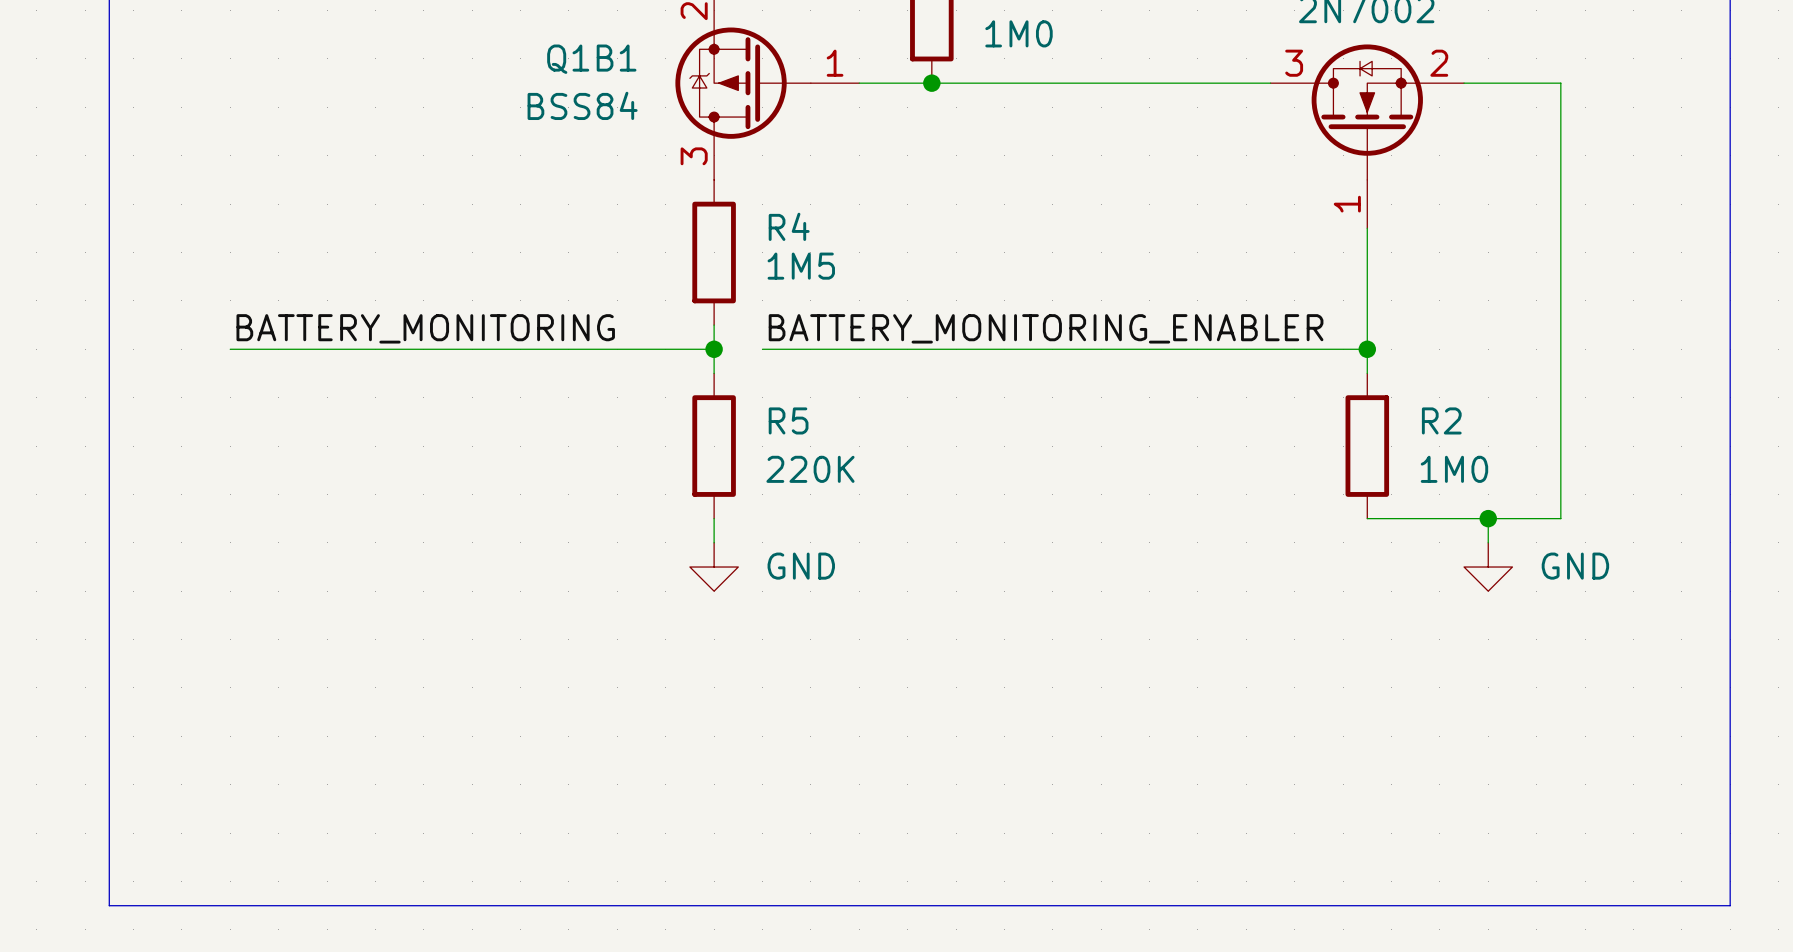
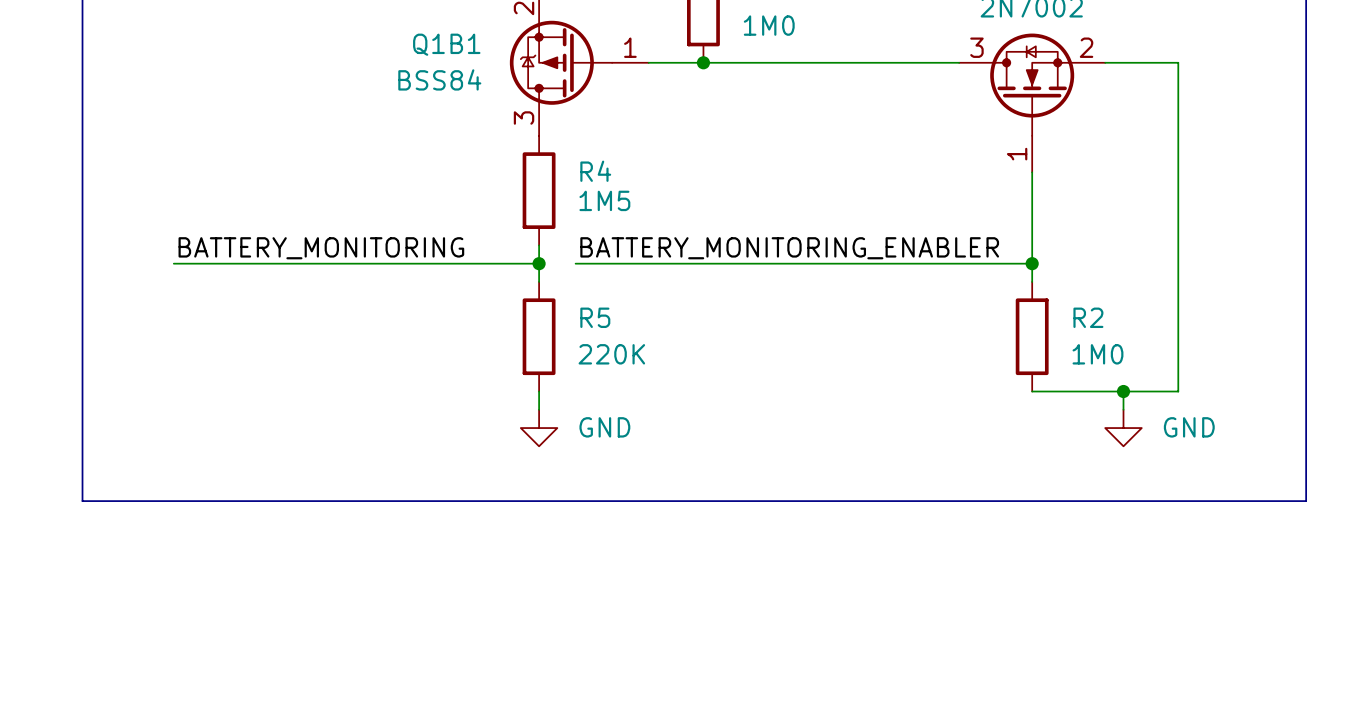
line: (109, 663) (109, 905) (1730, 905) (1730, 663) -> (82, 501) (1306, 501)

